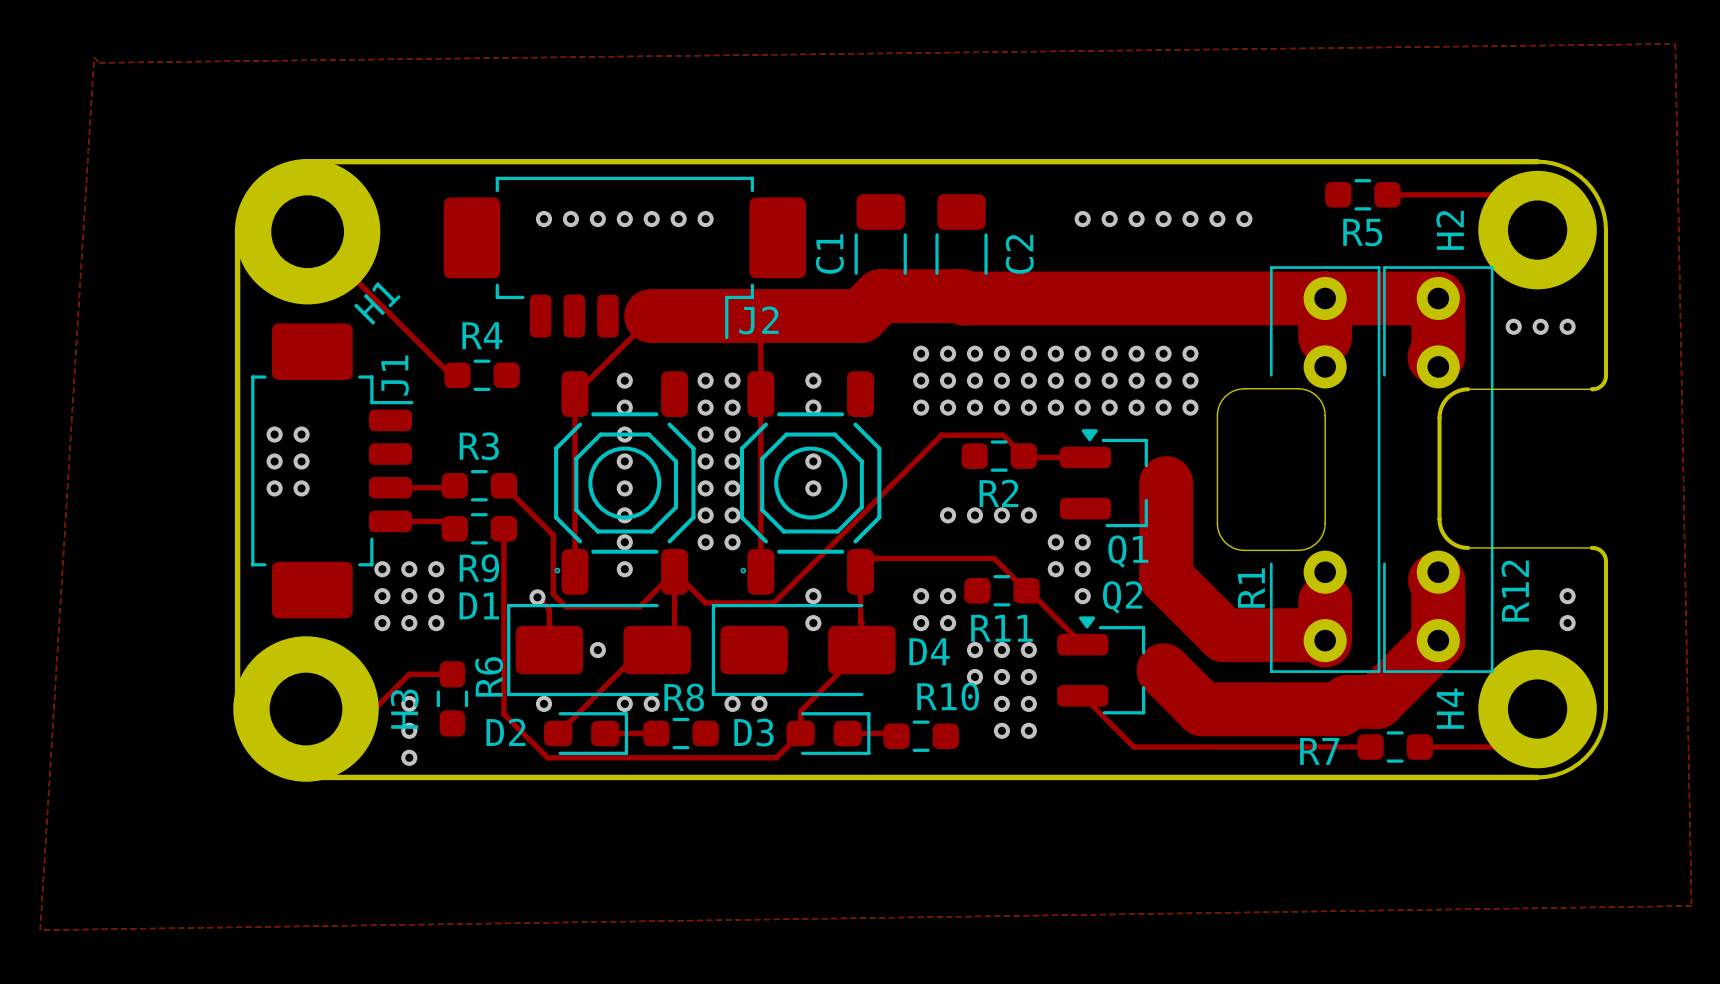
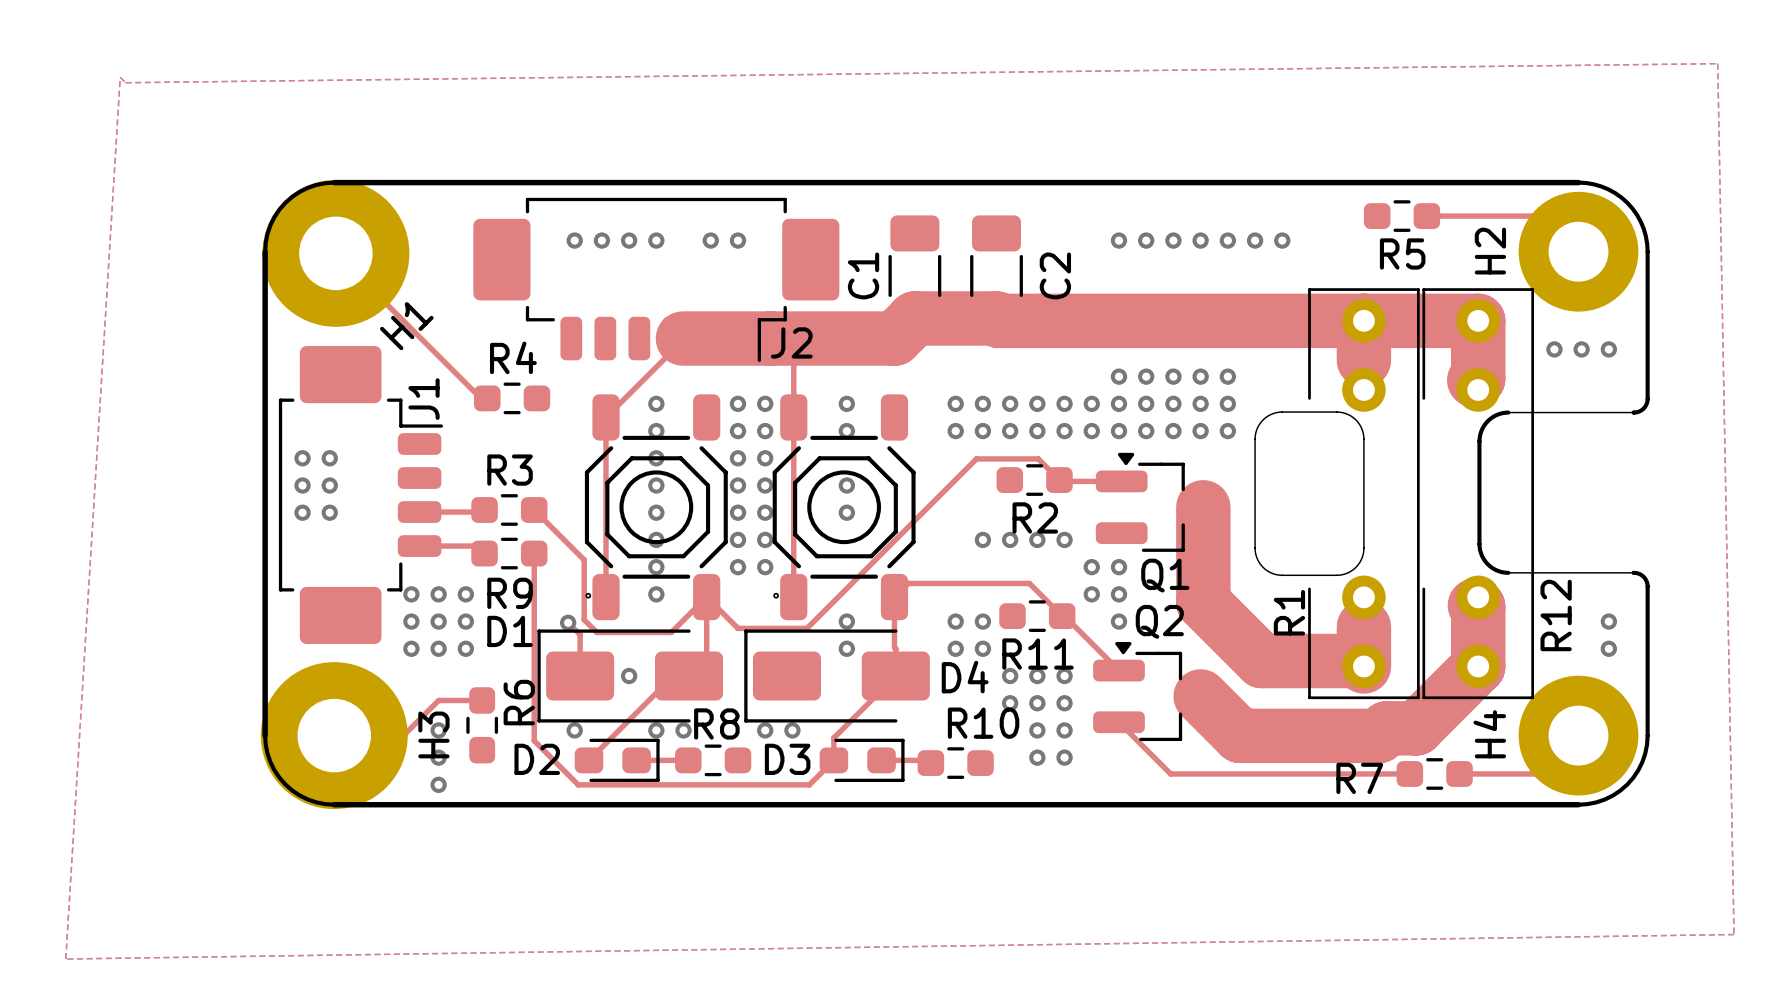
via: (651, 219) -> none
via: (921, 353) -> none
via: (948, 353) -> none
via: (974, 353) -> none
via: (1001, 353) -> none
via: (1028, 353) -> none
via: (1055, 353) -> none

